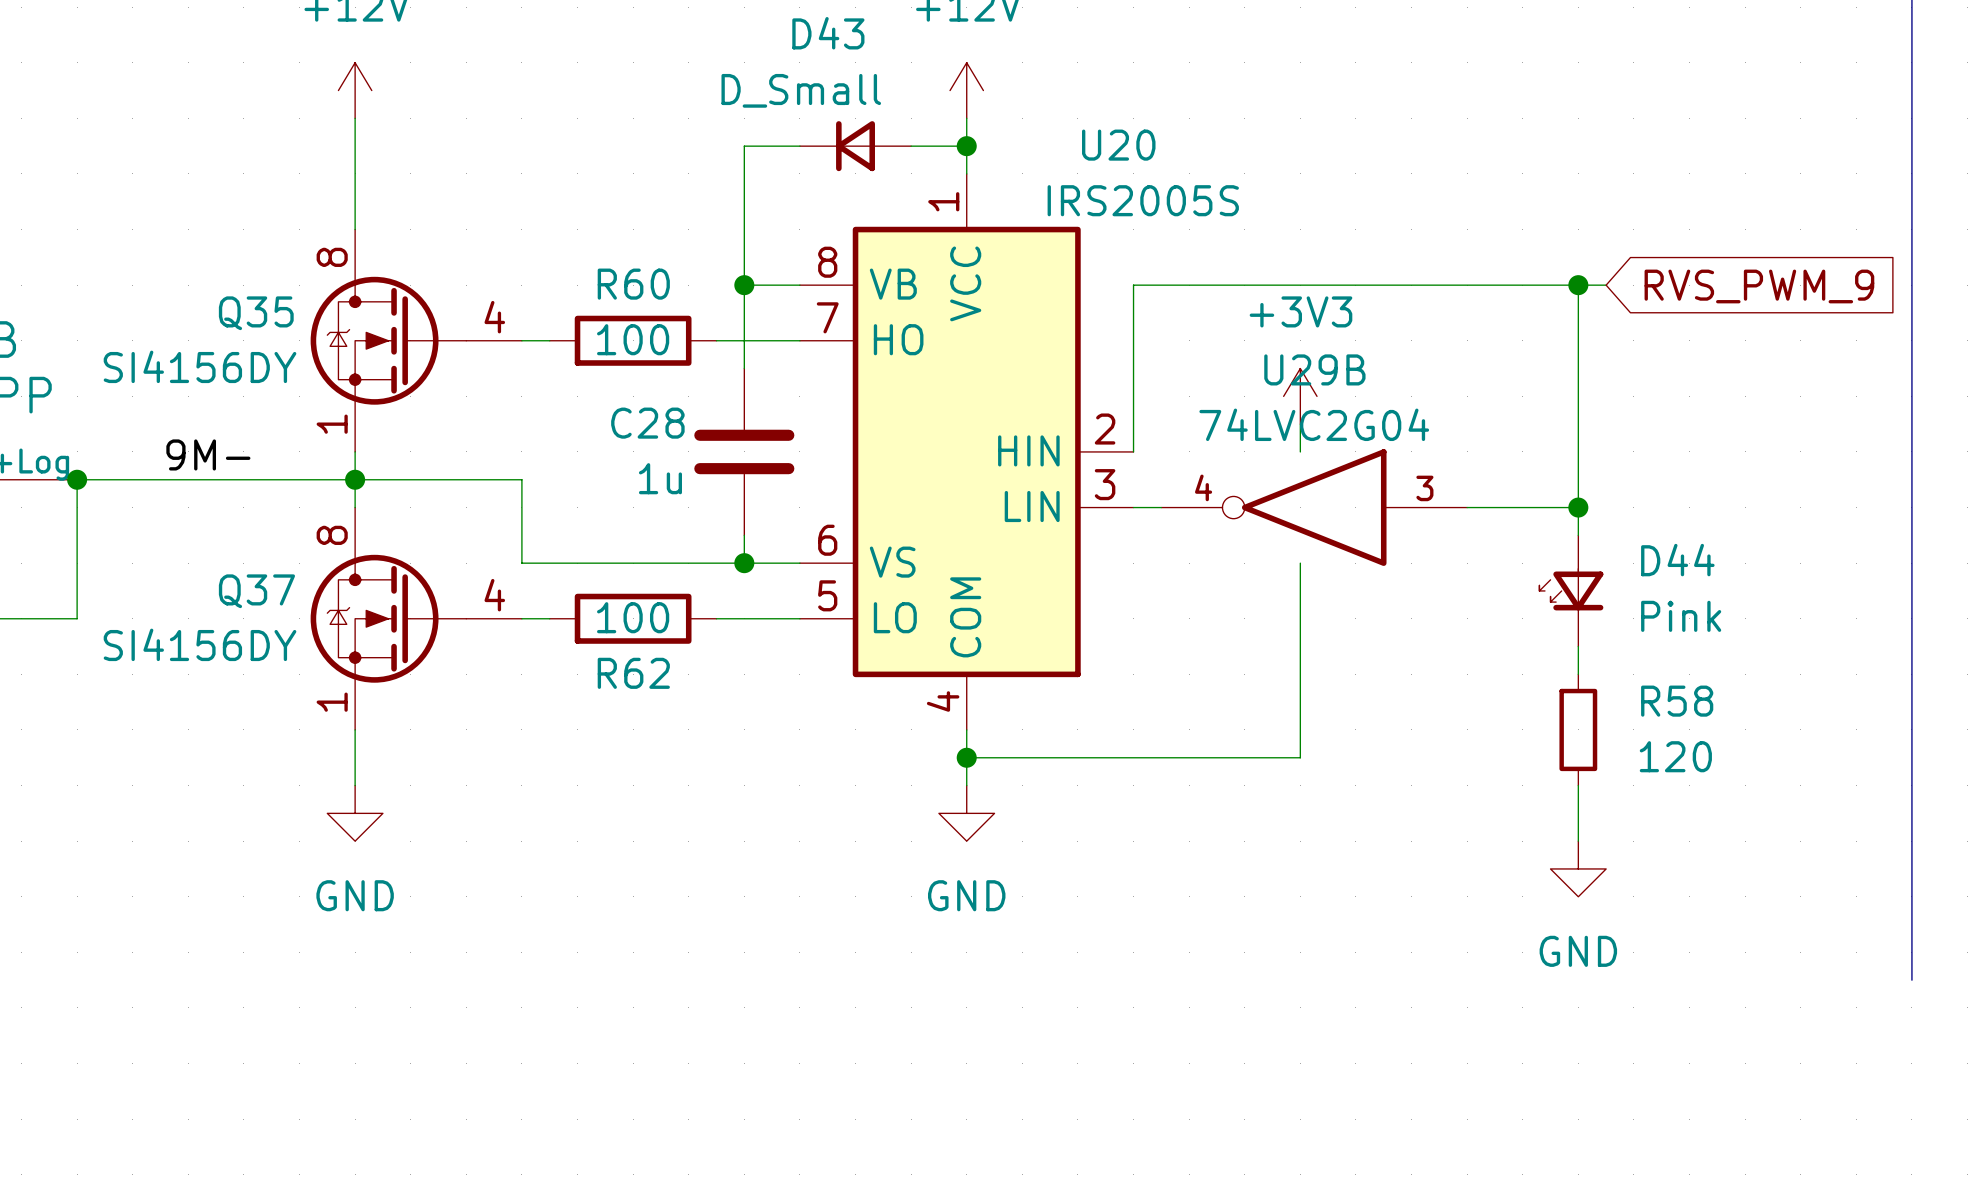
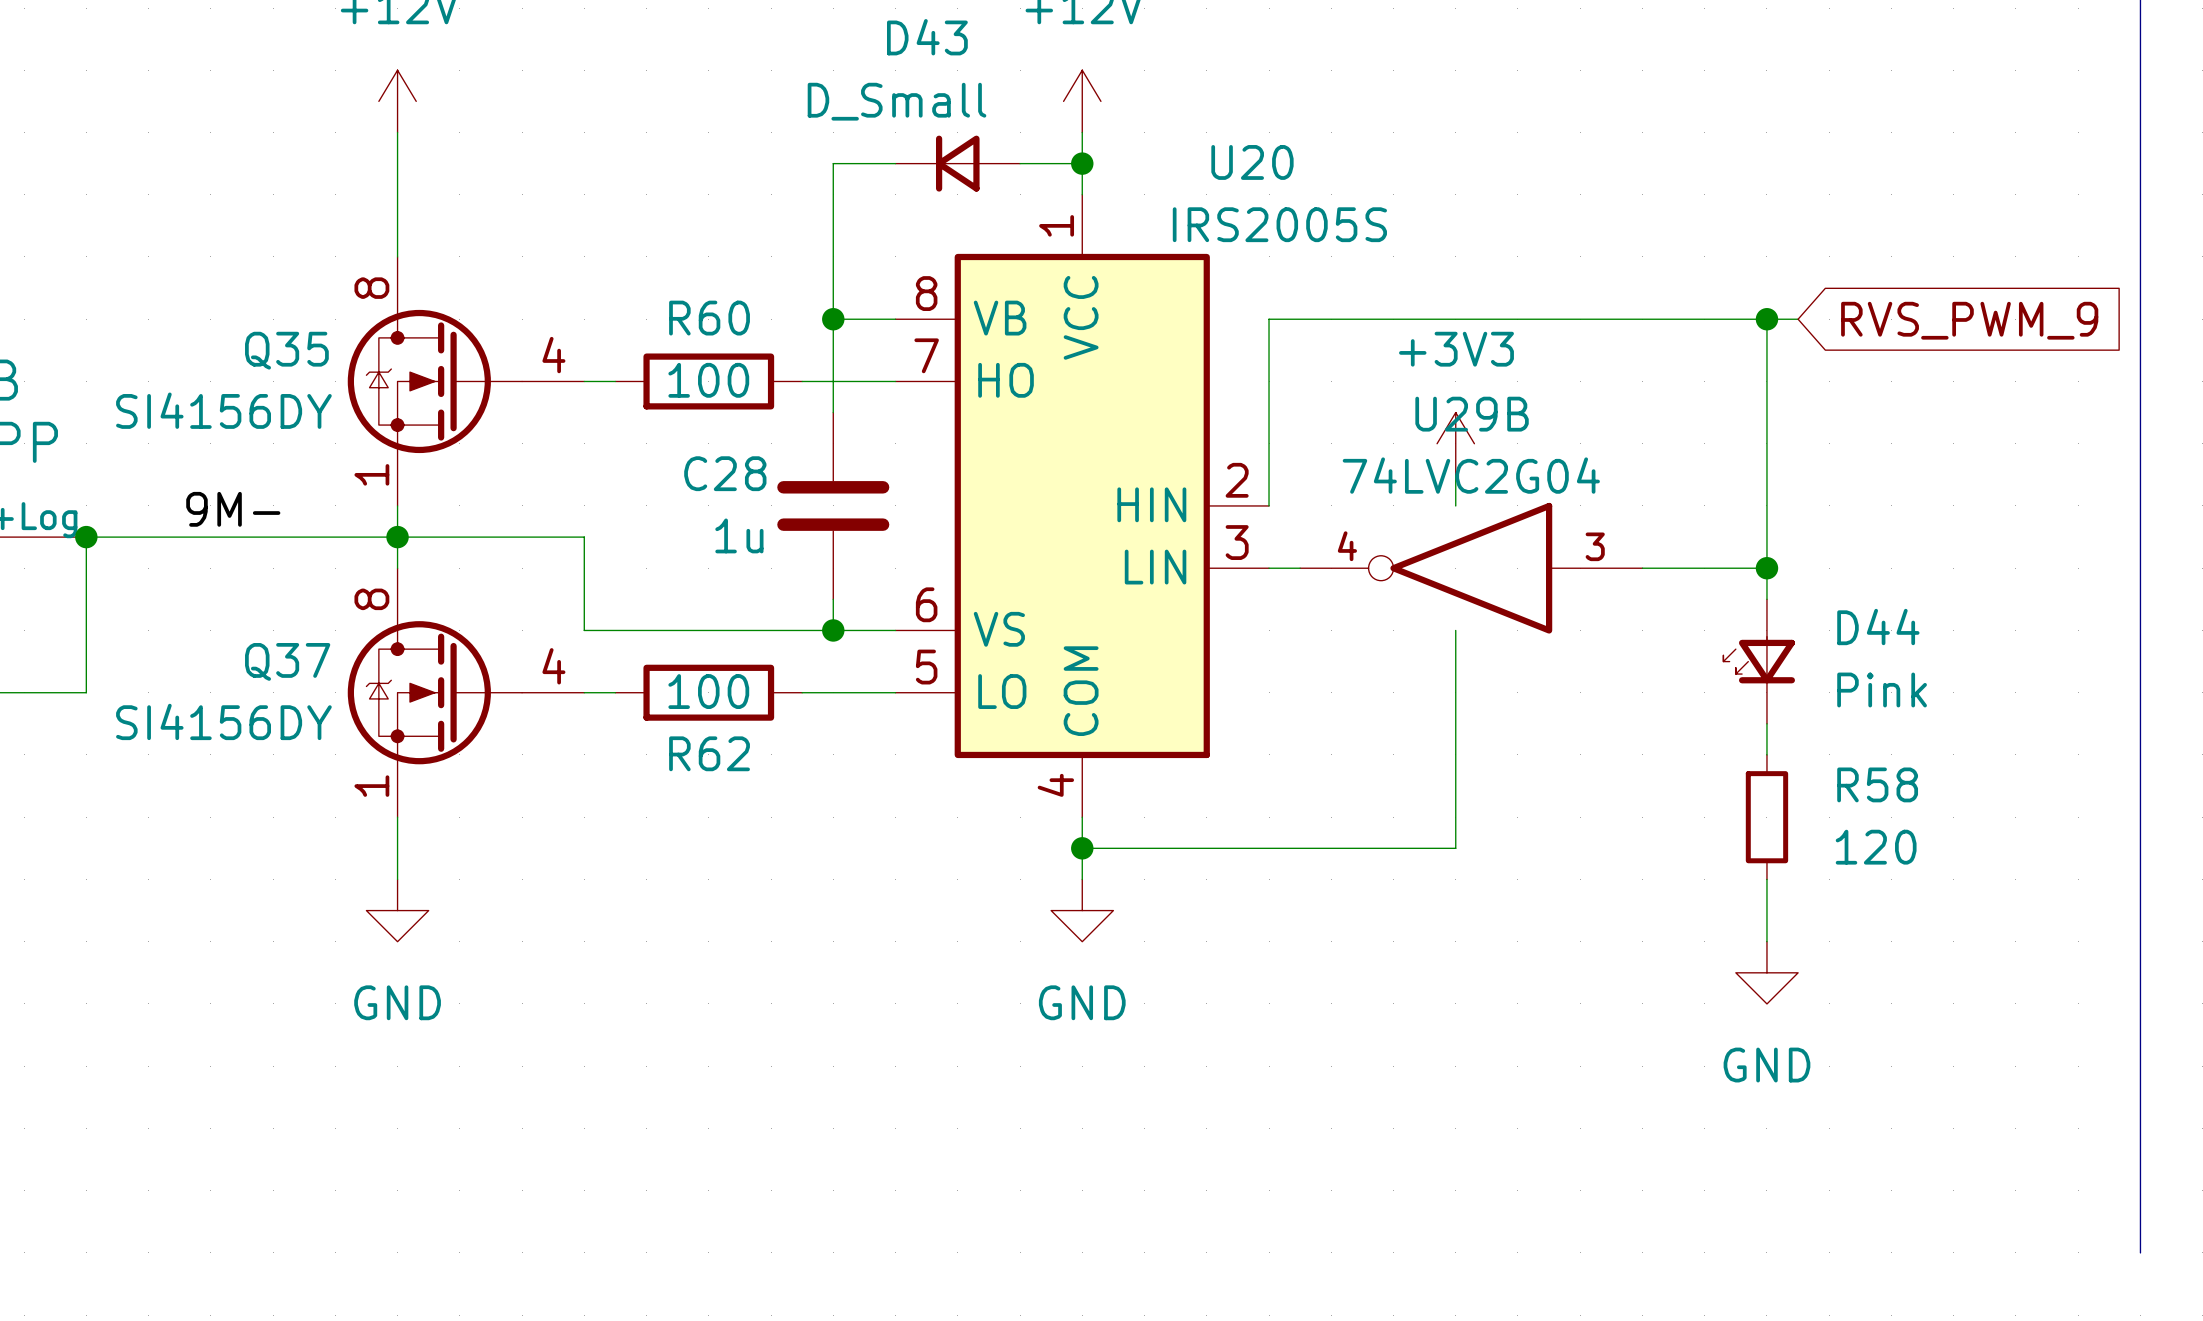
line: none -> (2140, 1097) (2140, 1252)

